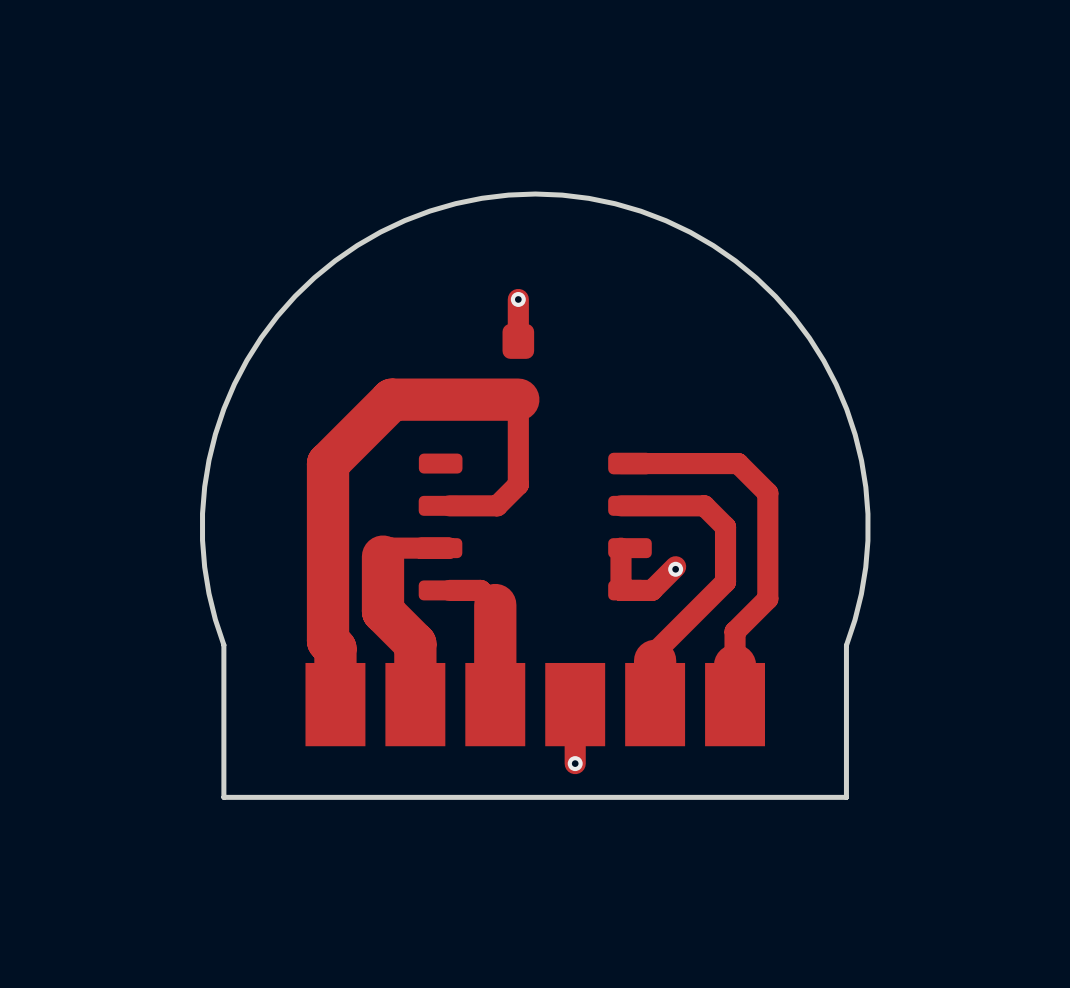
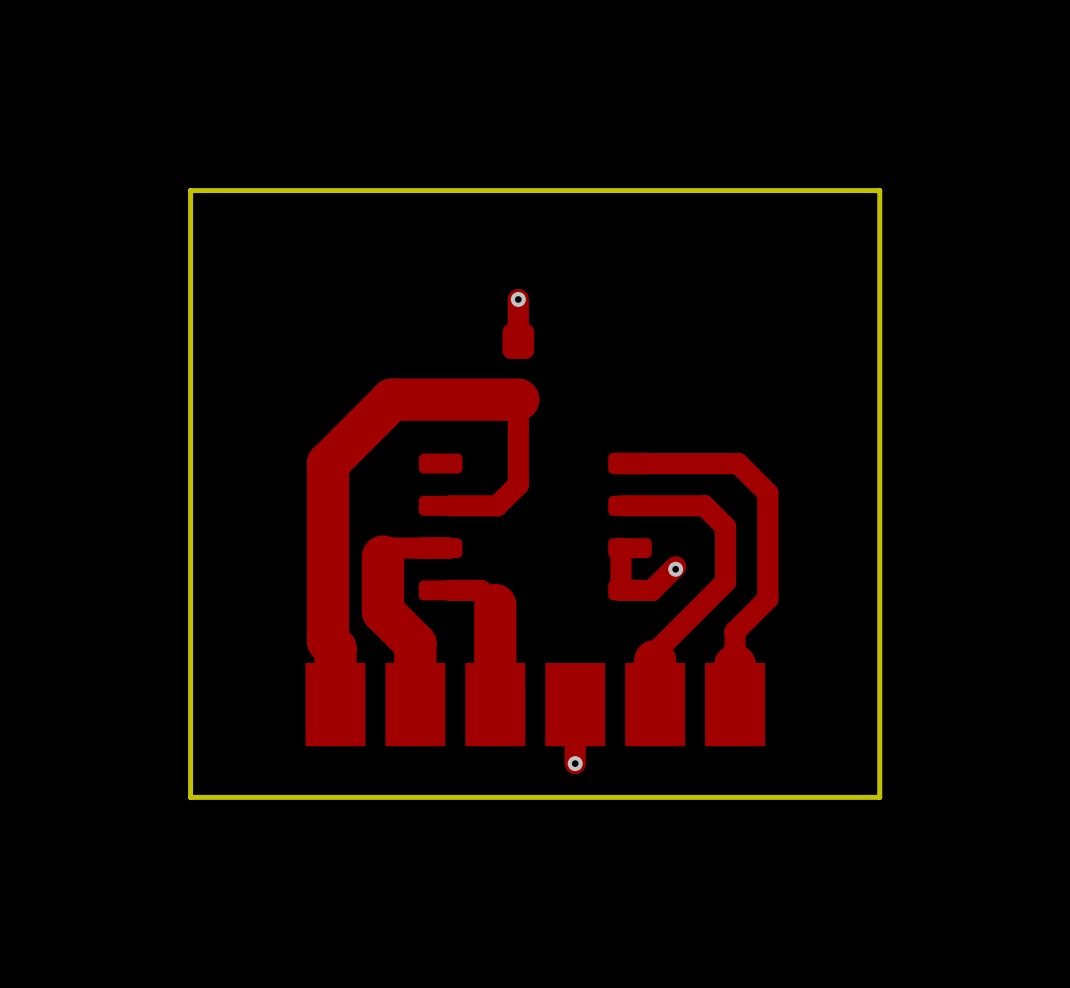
board edge: (846, 797) (846, 645) (861, 593) (865, 567) (867, 513) (861, 460) (855, 434) (836, 384) (809, 338) (793, 316) (756, 277) (713, 245) (666, 220) (640, 211) (588, 198) (535, 194) (508, 195) (455, 203) (404, 220) (357, 245) (314, 277) (277, 316) (261, 337) (234, 384) (223, 408) (209, 460) (202, 513) (204, 567) (208, 593) (223, 645) (223, 797) -> (846, 797) (879, 797) (879, 190) (190, 190) (190, 797) (223, 797)

